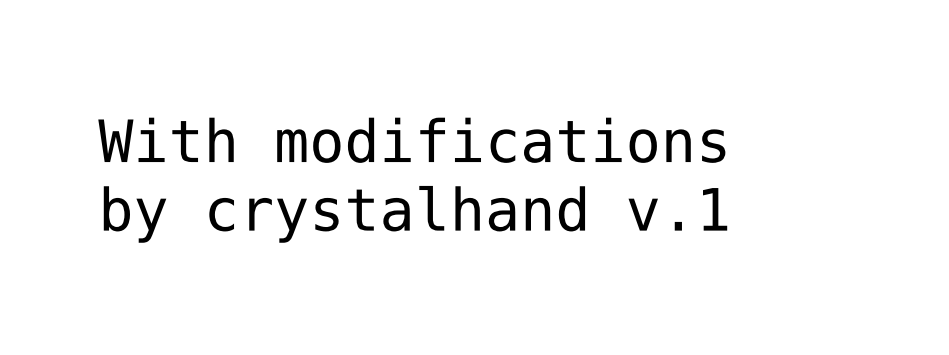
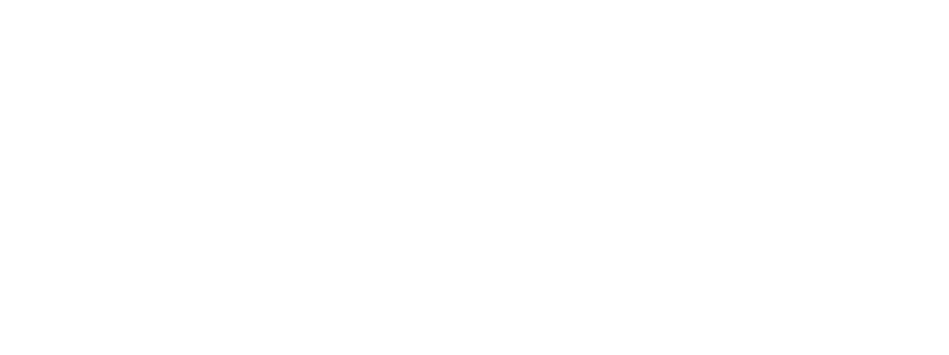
text: With modifications (411, 140) -> none
text: by crystalhand v.1 (415, 214) -> none

